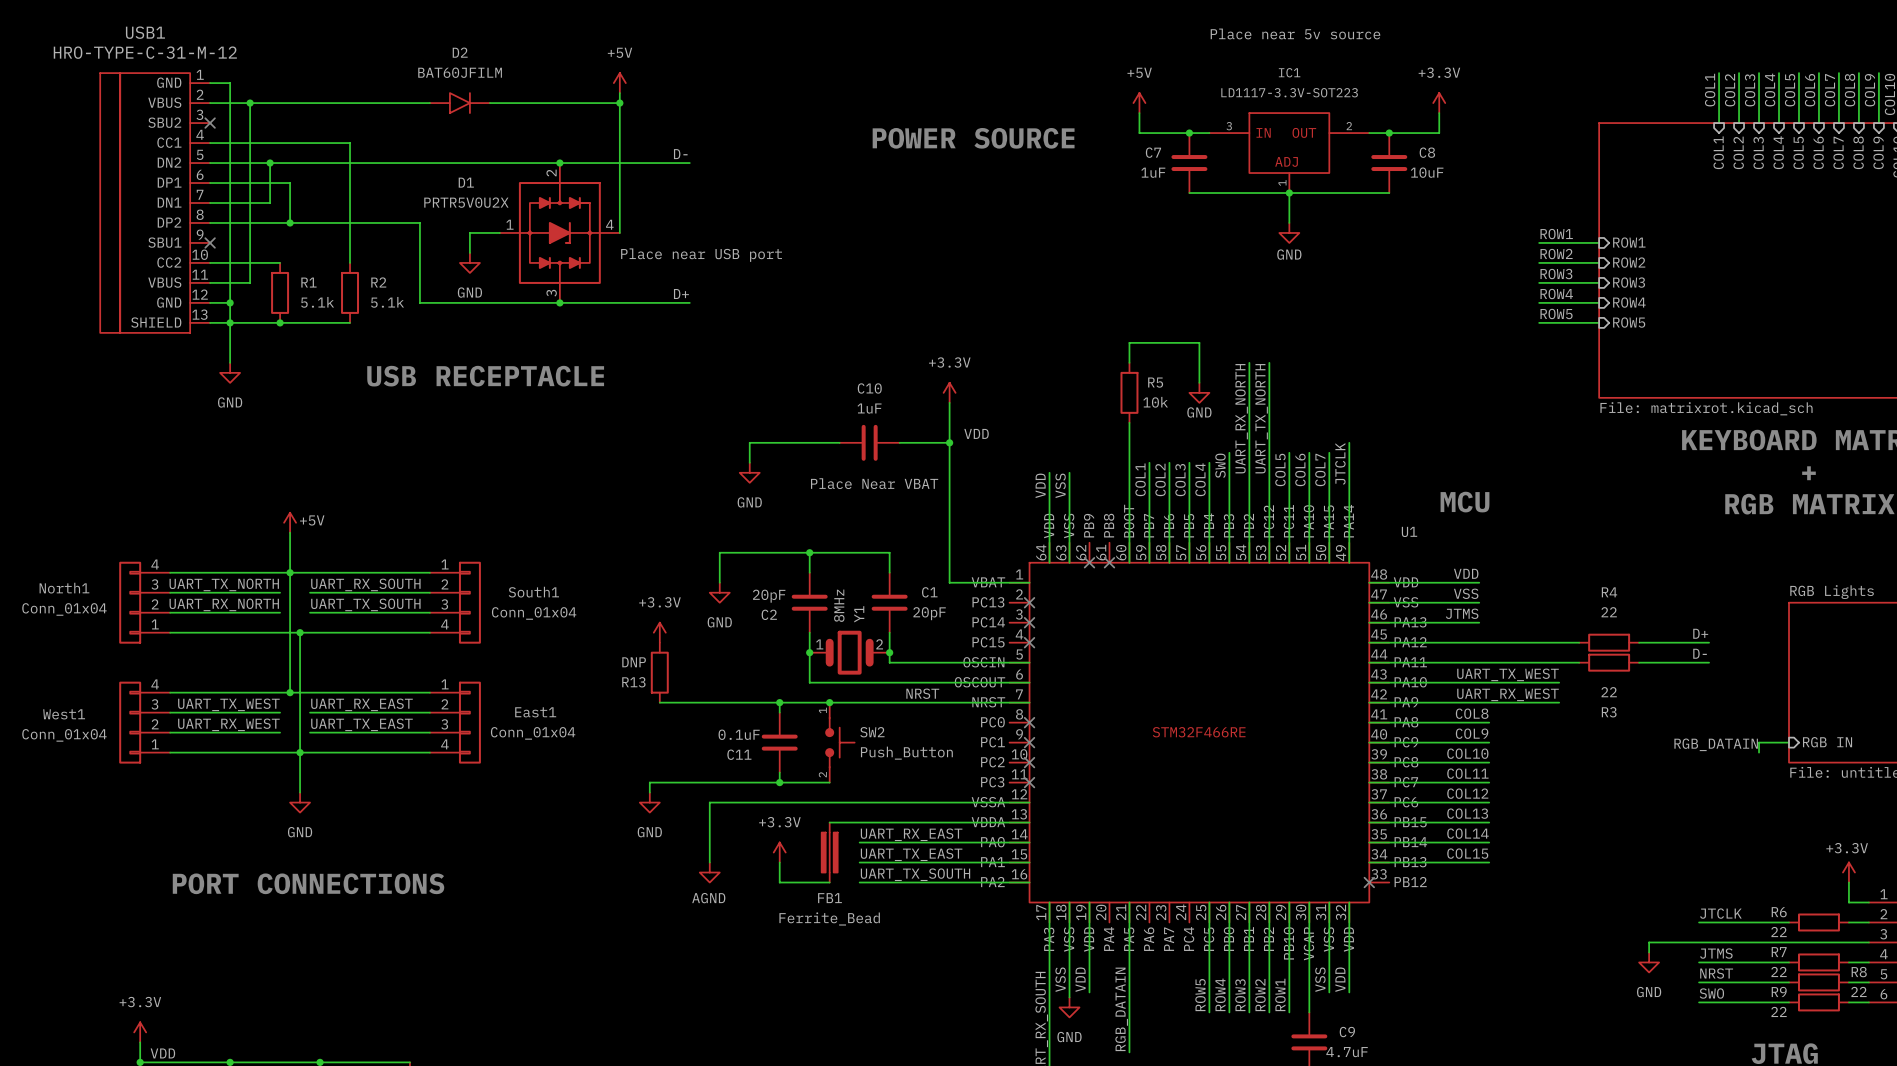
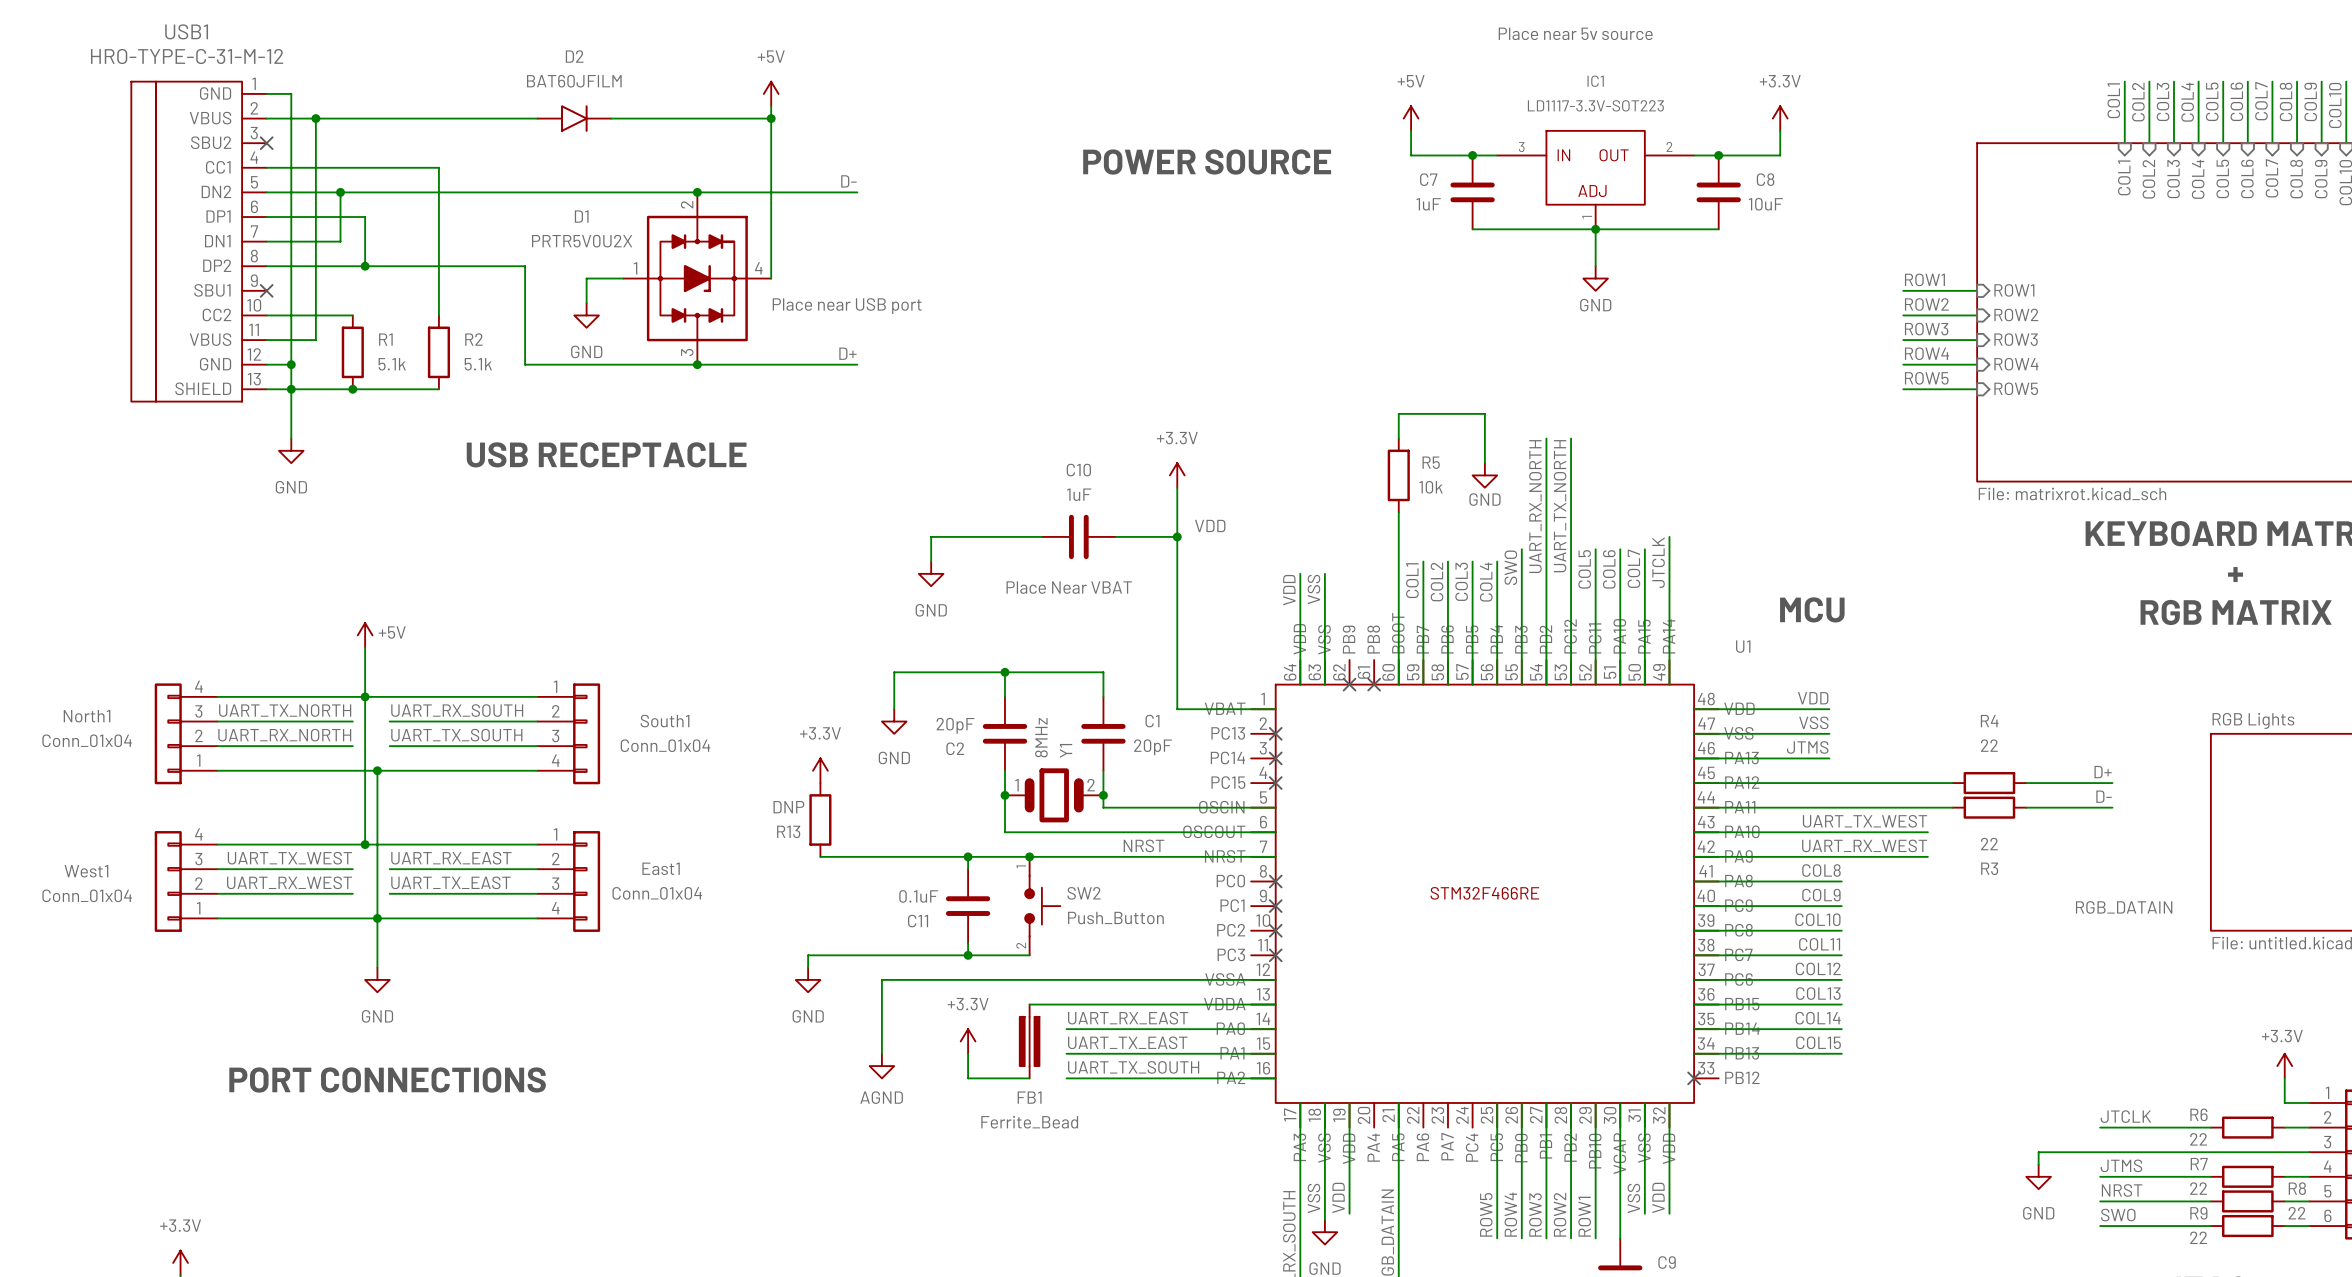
wire: (1789, 742) (1759, 742) (1759, 752) -> none
sheet pin: RGB IN (1827, 742) -> none

